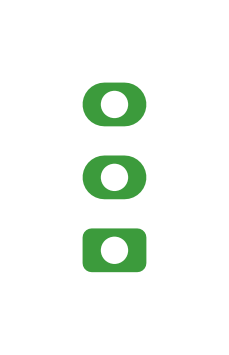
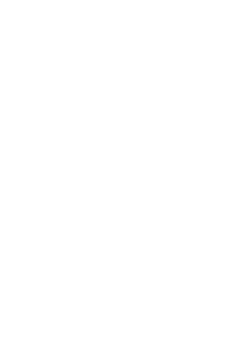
part: (114, 177) -> none

